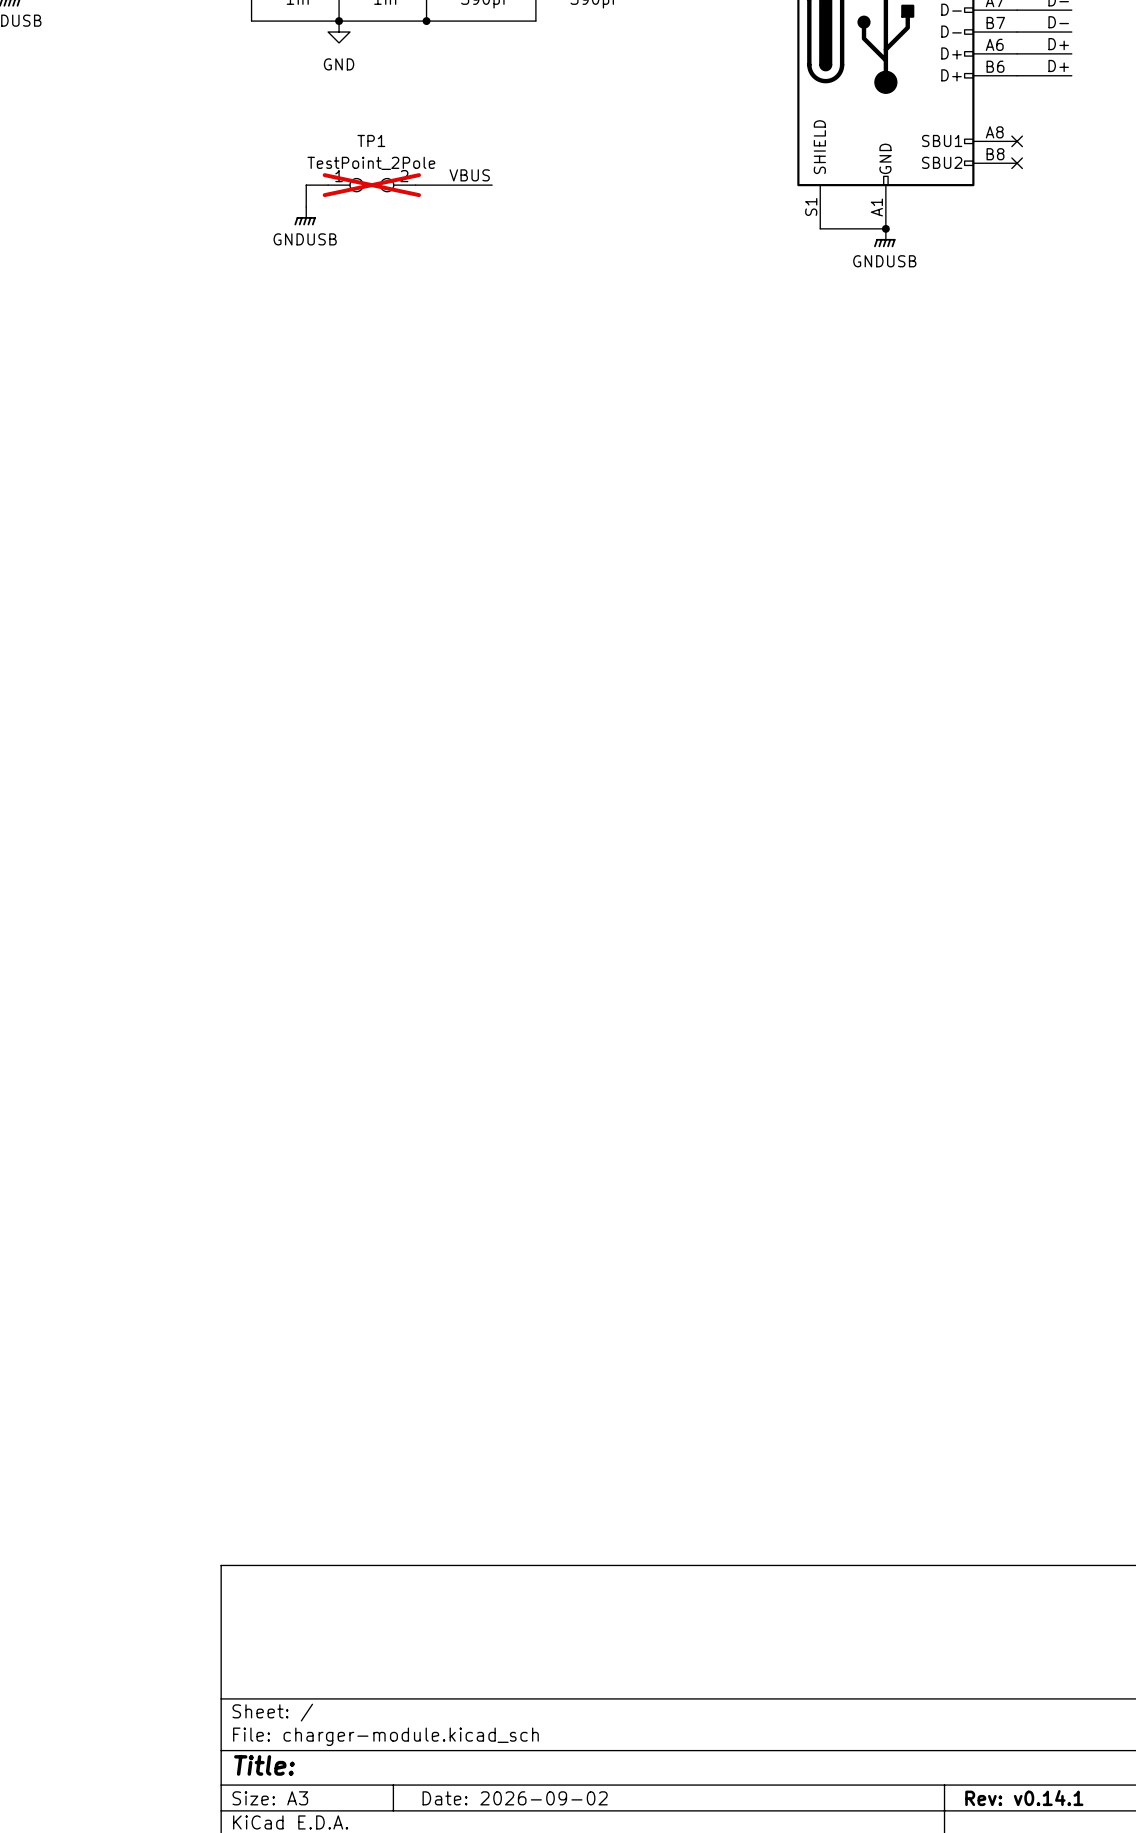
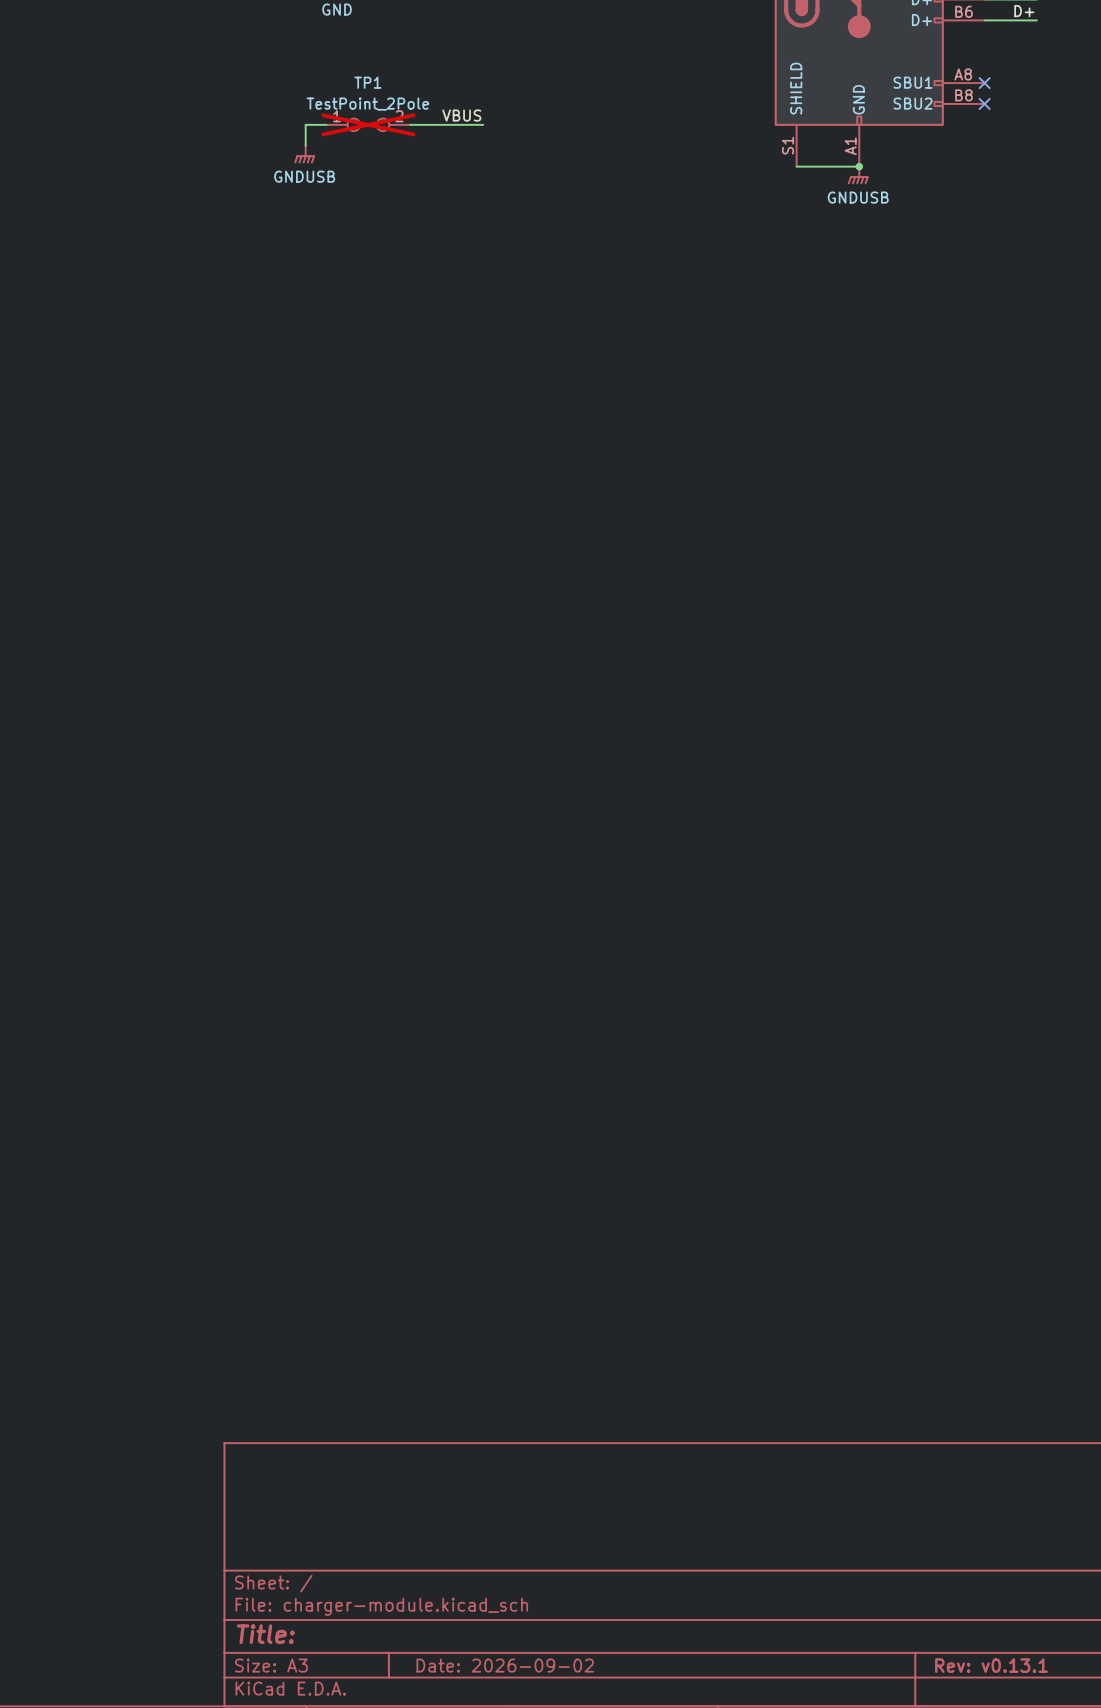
title block: Rev: v0.14.1 (1024, 1798) -> Rev: v0.13.1 (991, 1665)

